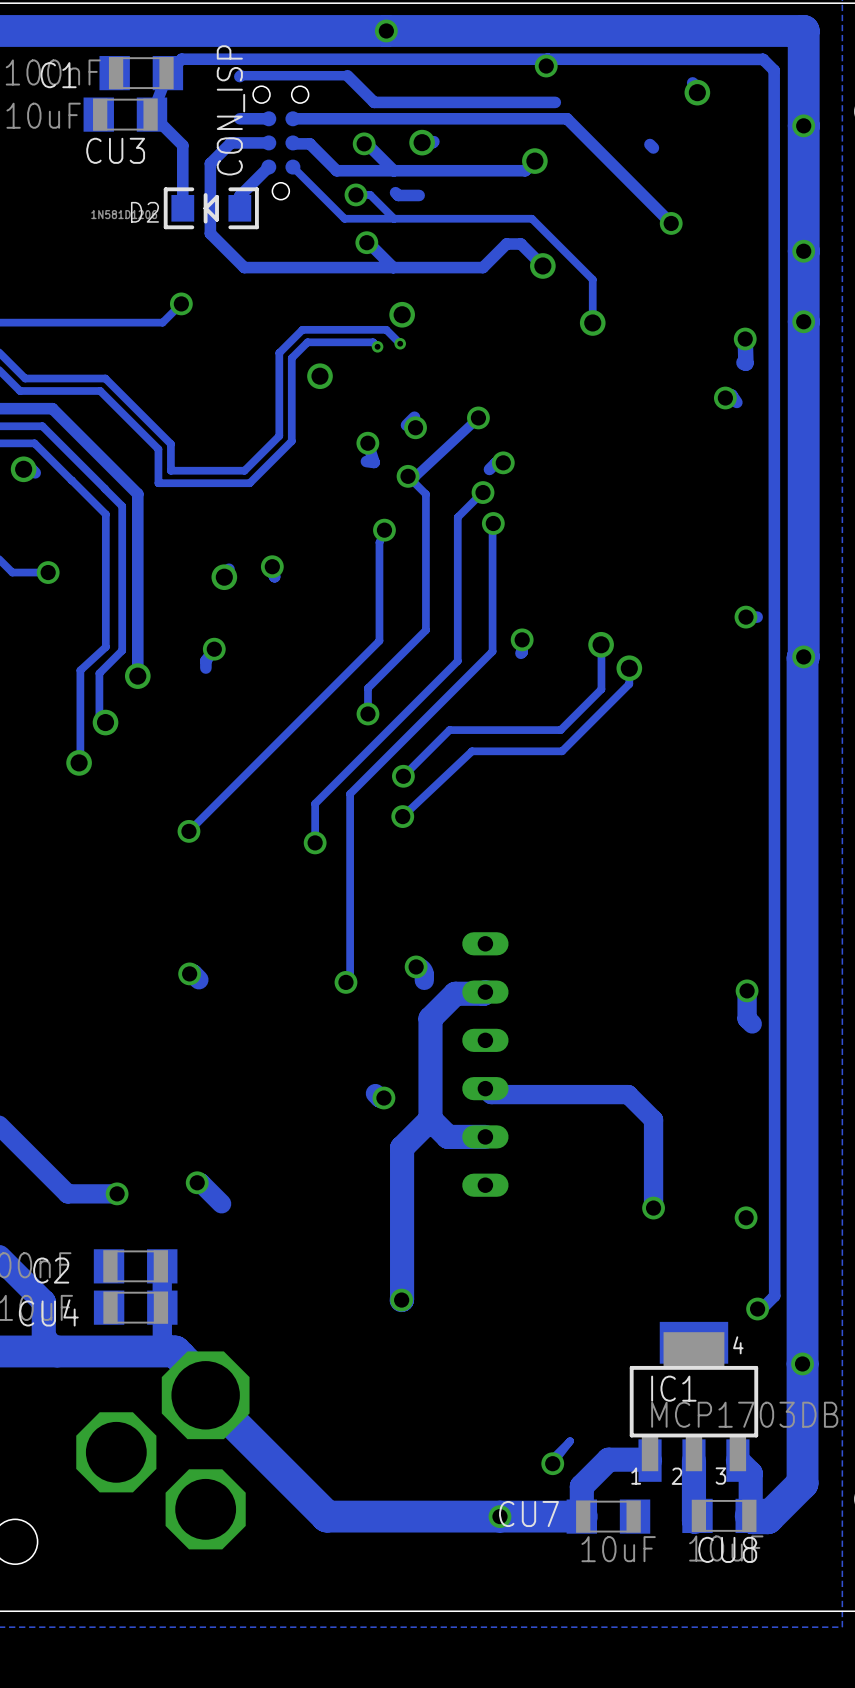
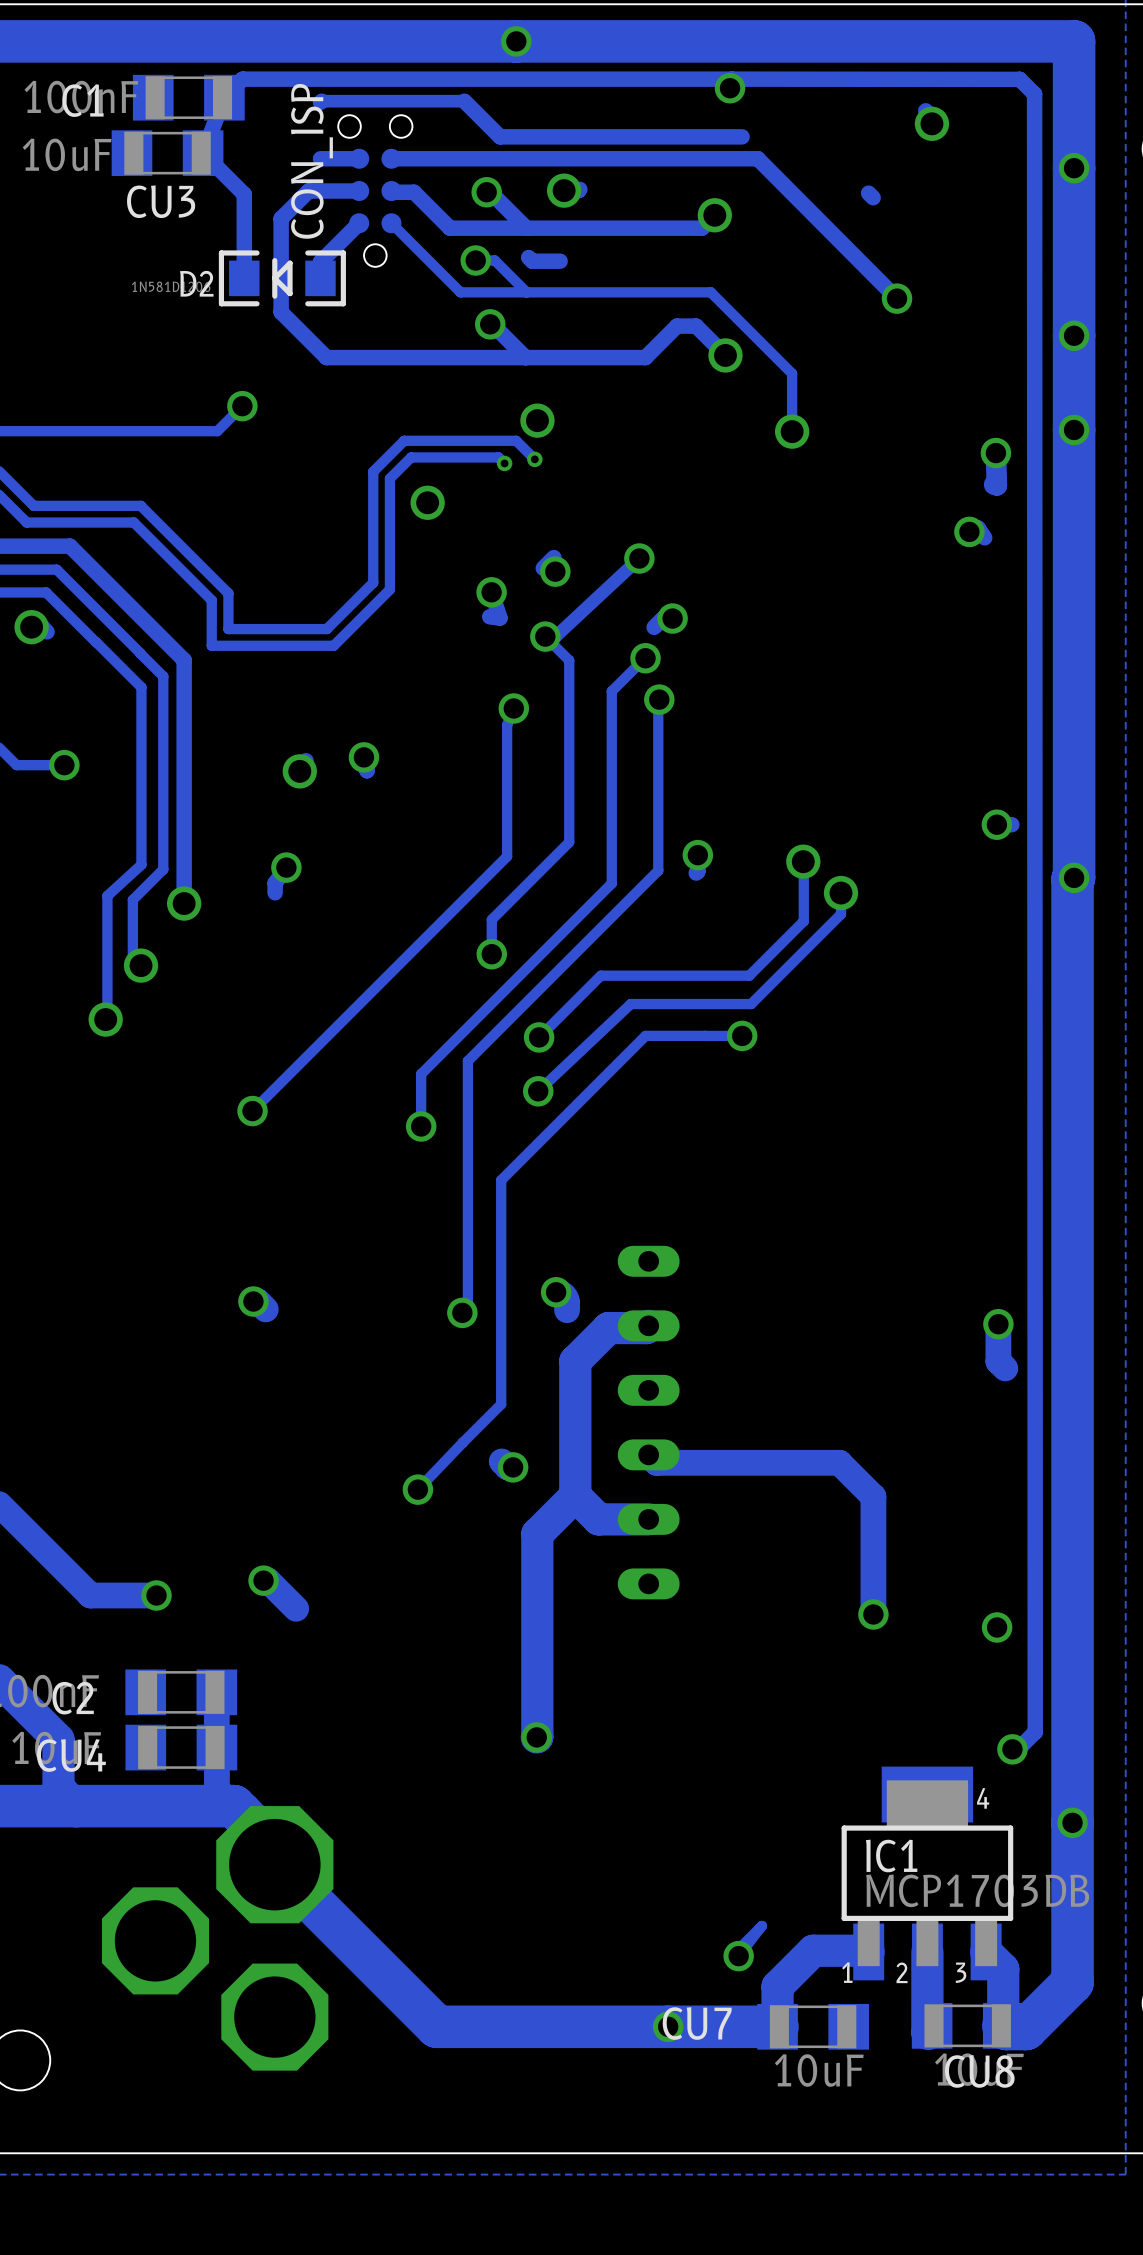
track: none -> (742, 1035) (645, 1035) (501, 1180) (501, 1404) (417, 1489)
via: none -> (742, 1035)
via: none -> (417, 1489)

